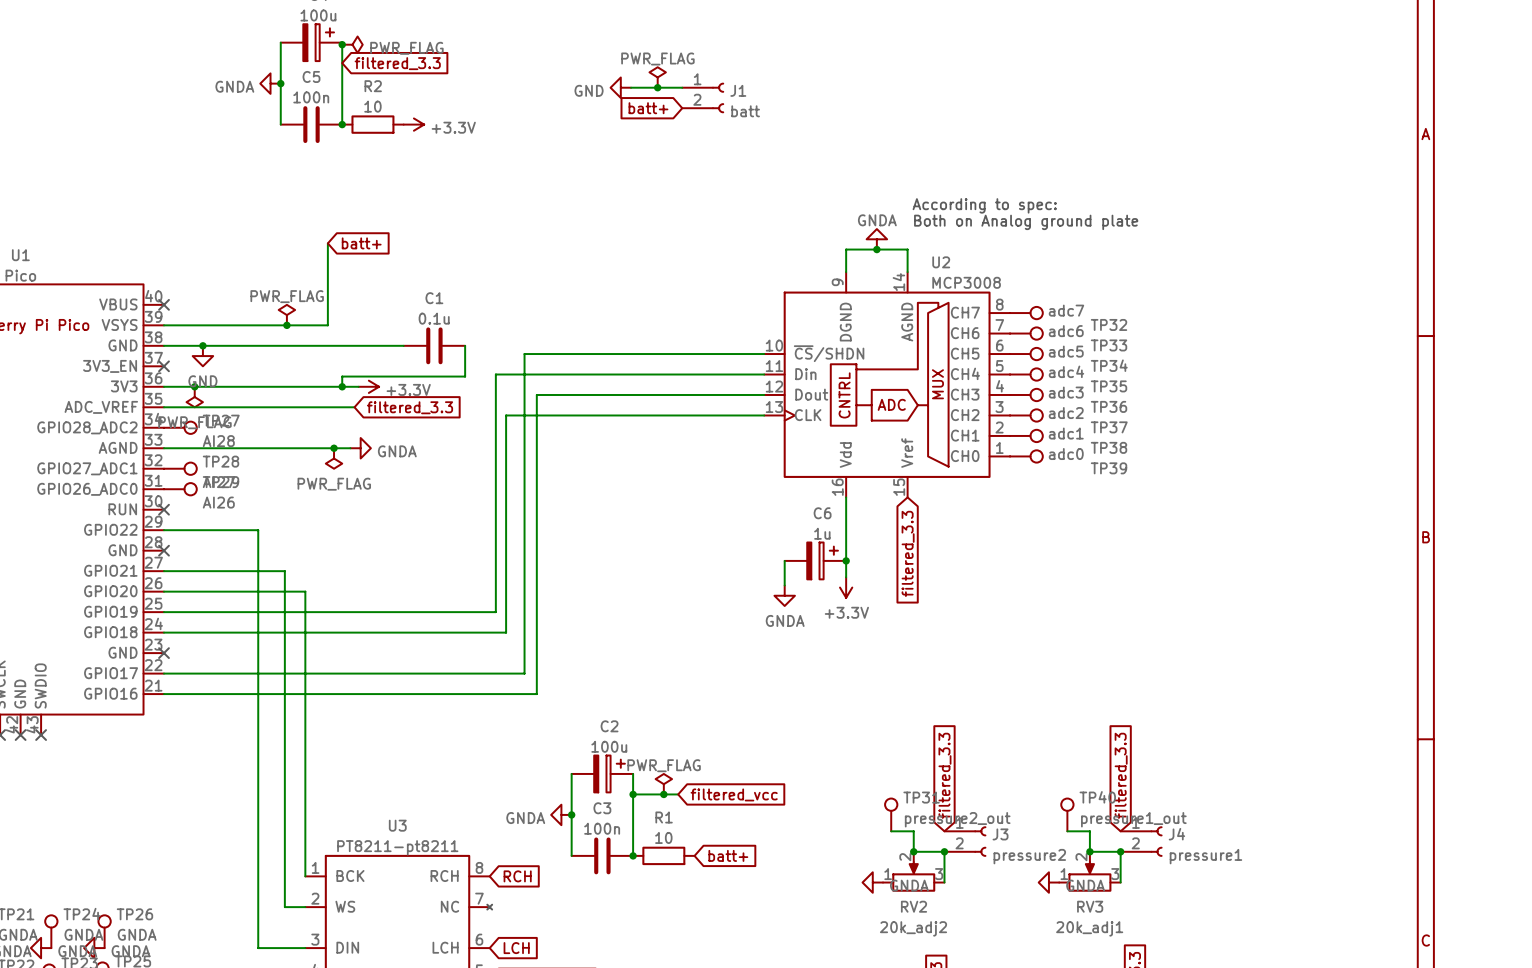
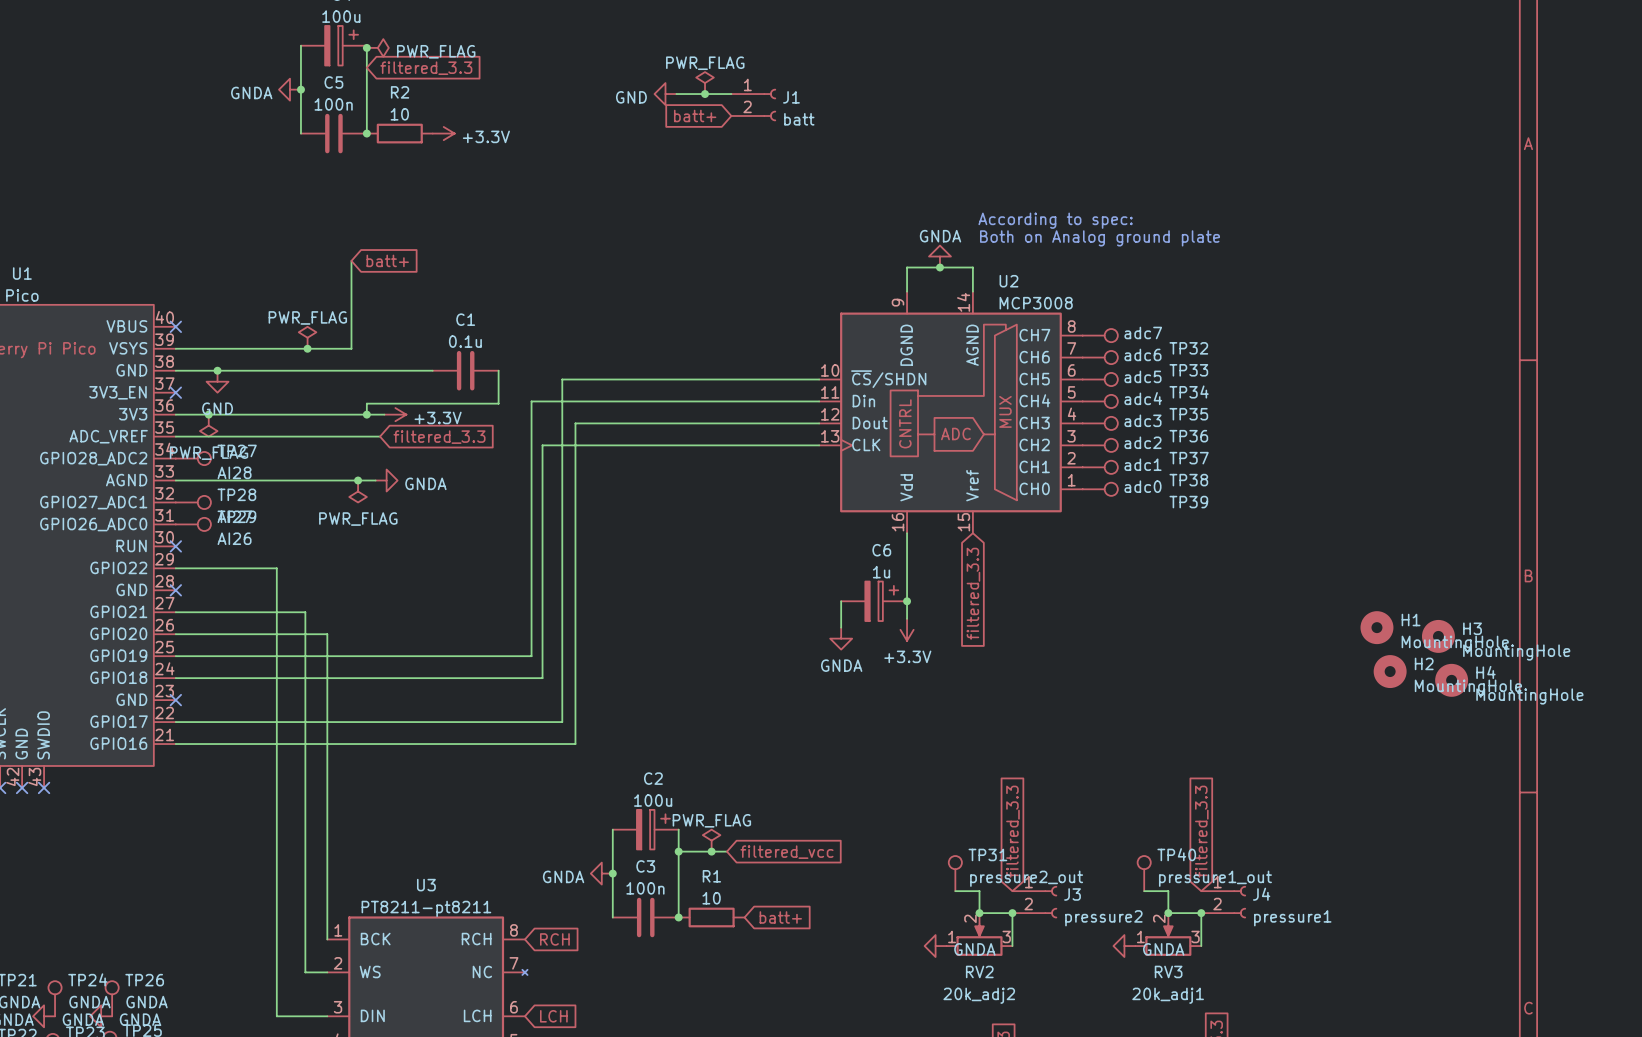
H1: none -> MountingHole (1376, 627)
H3: none -> MountingHole (1438, 636)
H2: none -> MountingHole (1390, 671)
H4: none -> MountingHole (1451, 680)

